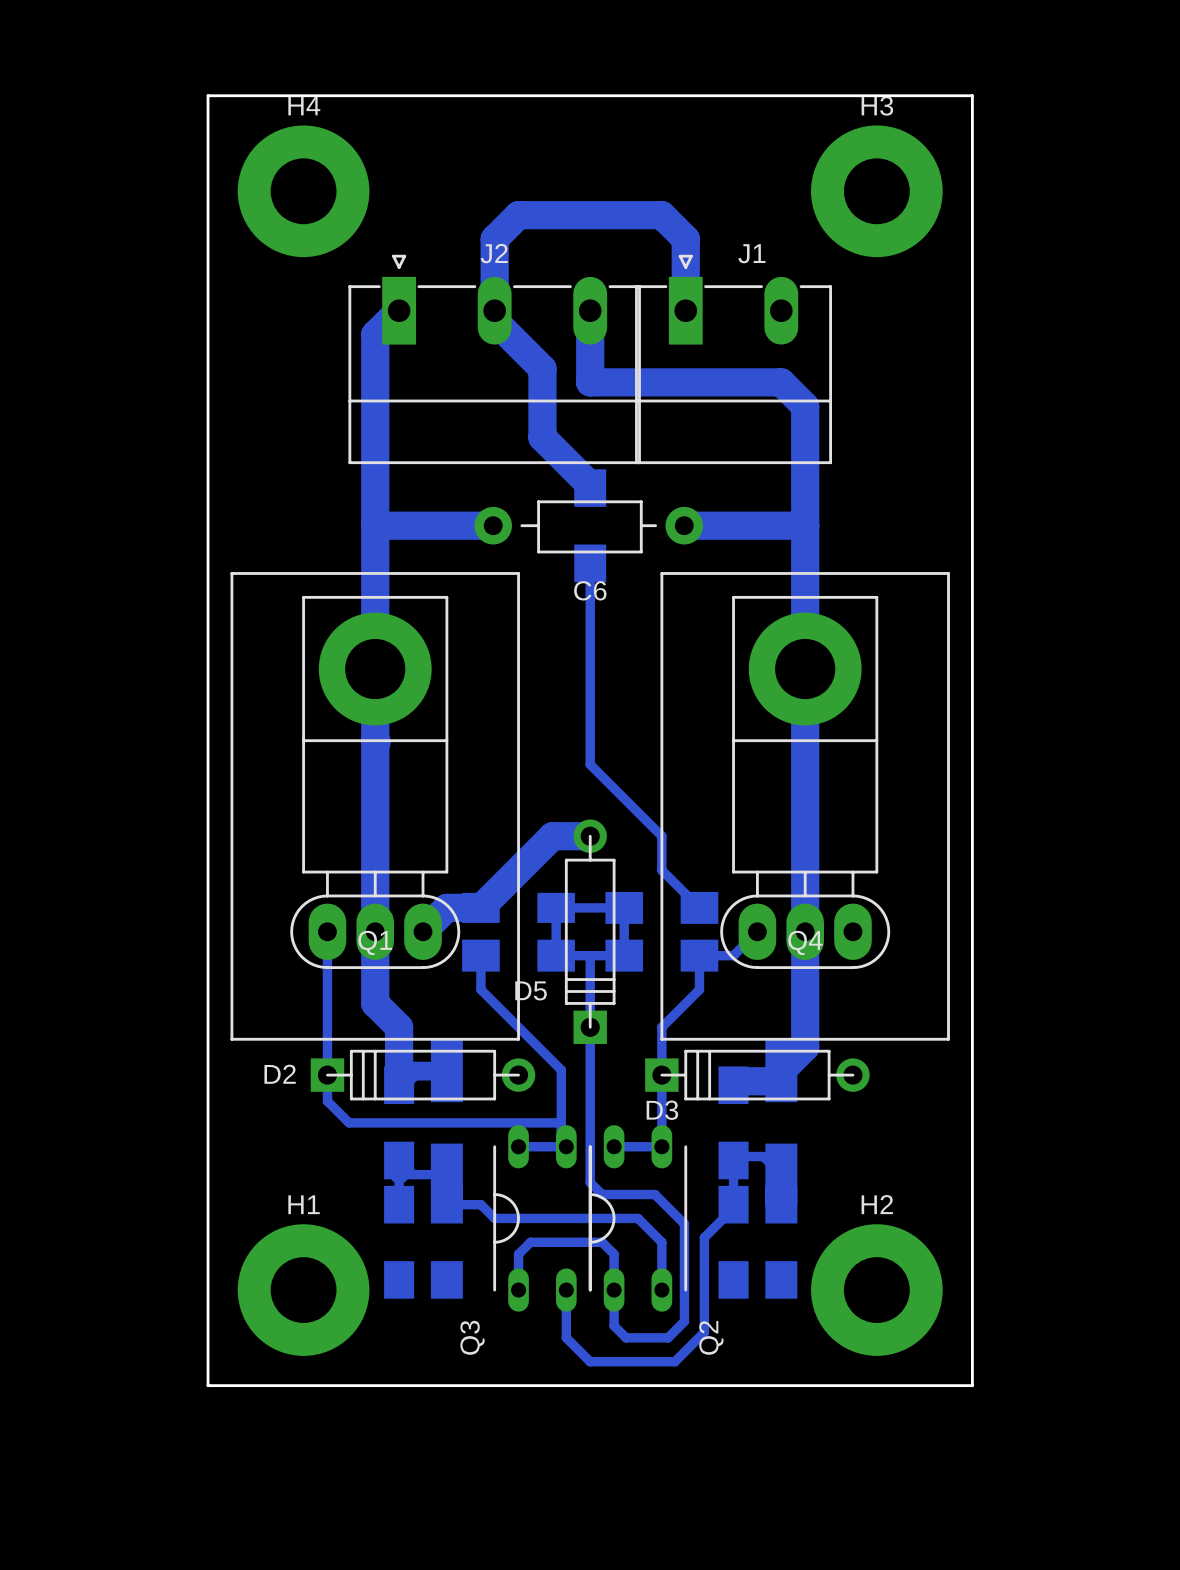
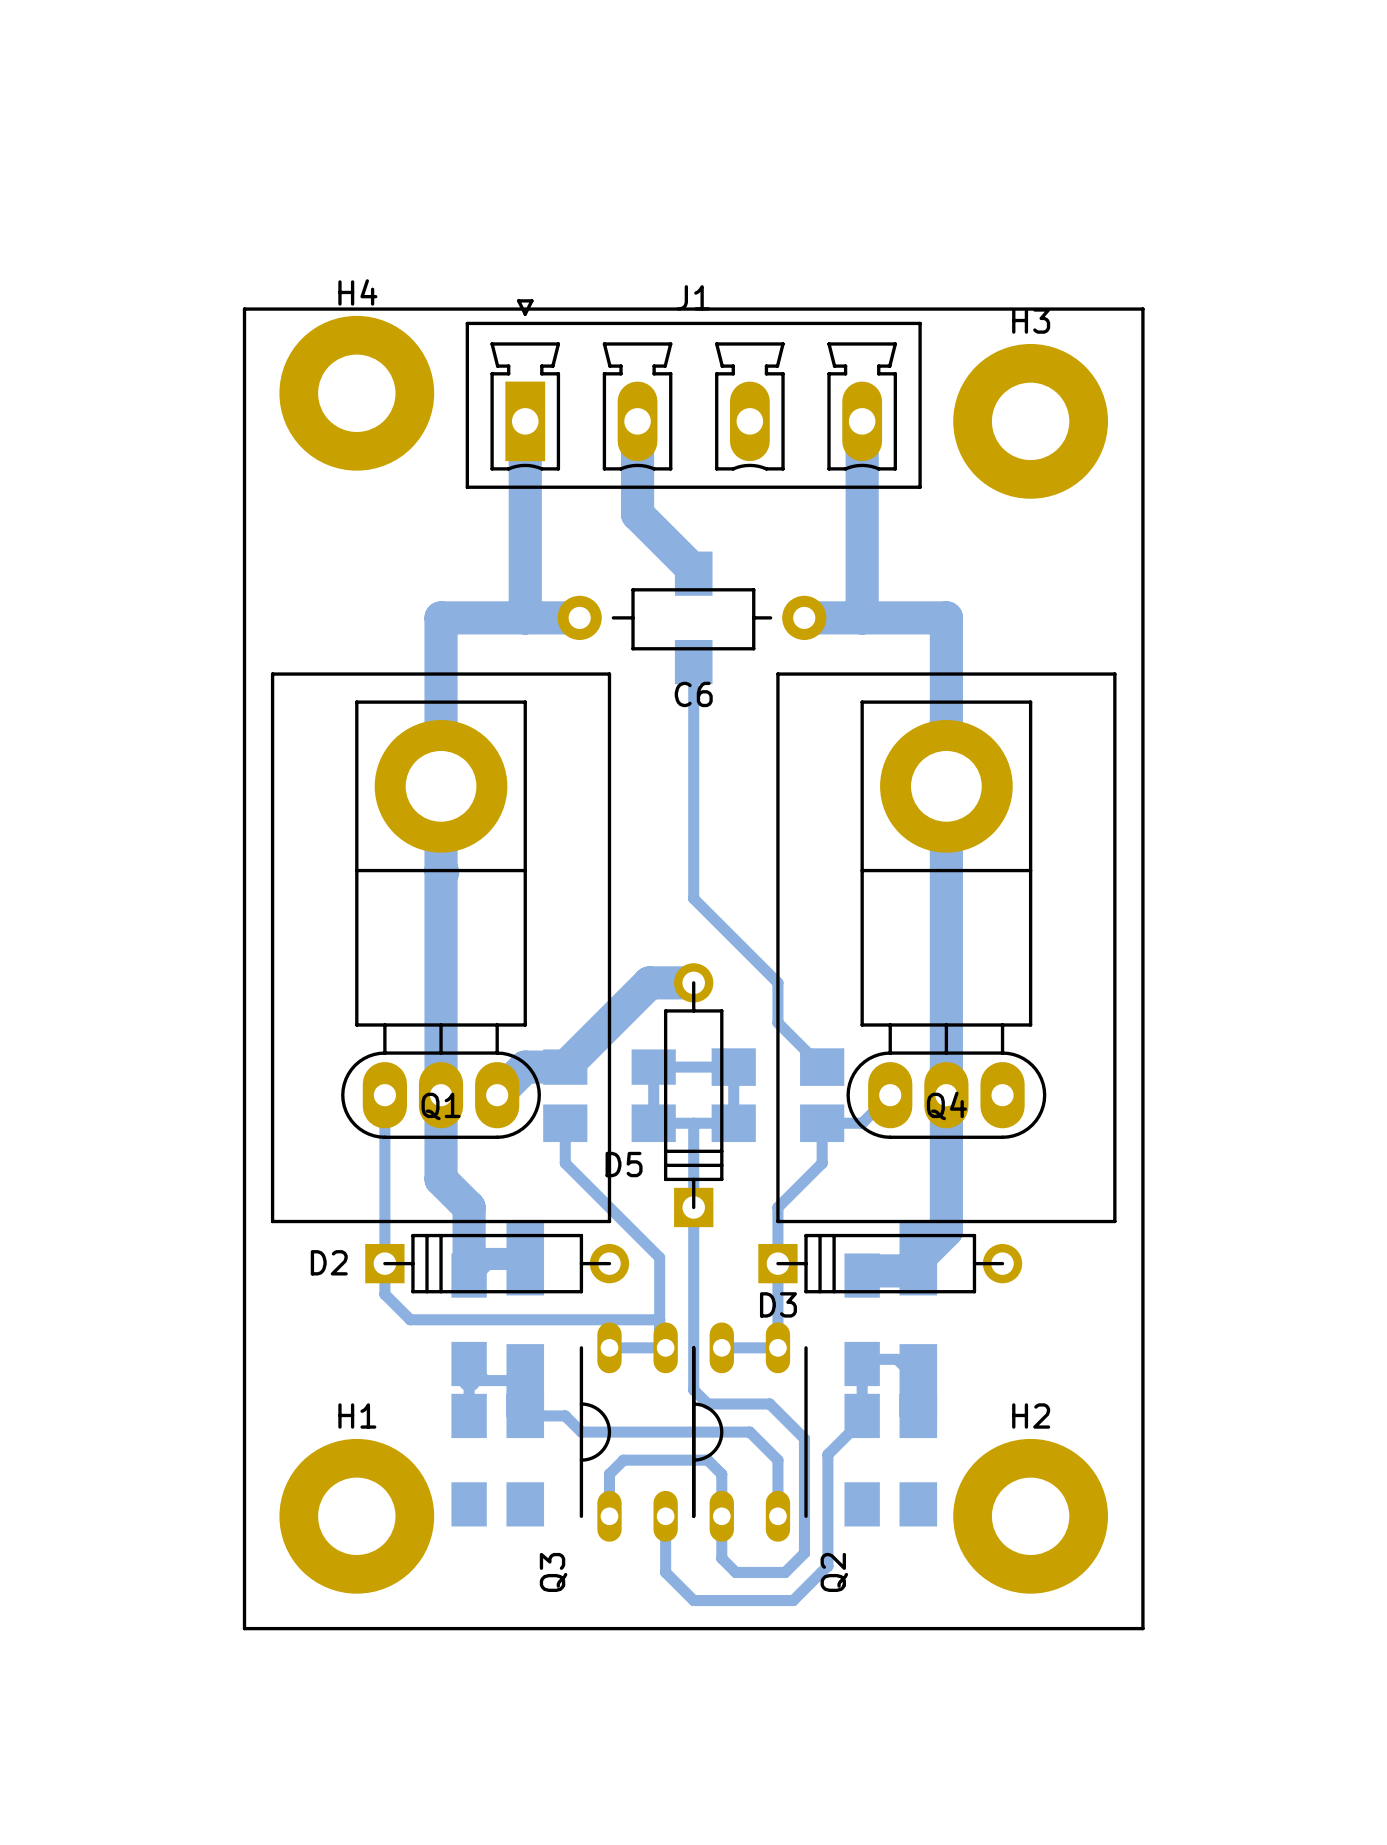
H4 position: (303, 191) -> (356, 393)
H3 position: (876, 191) -> (1030, 421)
J1 footprint: [635, 254, 832, 465] -> [465, 299, 922, 489]
board edge: (208, 262) (208, 95) (972, 95) (972, 262) -> (244, 309) (1142, 309)
bottom track: (399, 310) (375, 334) (375, 525) -> none
bottom track: (494, 310) (494, 239) (518, 215) (661, 215) (685, 239) (685, 310) -> none
bottom track: (590, 310) (590, 382) (781, 382) (805, 406) (805, 525) -> none
bottom track: (494, 320) (542, 368) -> none
bottom track: none -> (525, 421) (525, 617)
bottom track: none -> (862, 421) (862, 617)
J2: (494, 359) -> none

